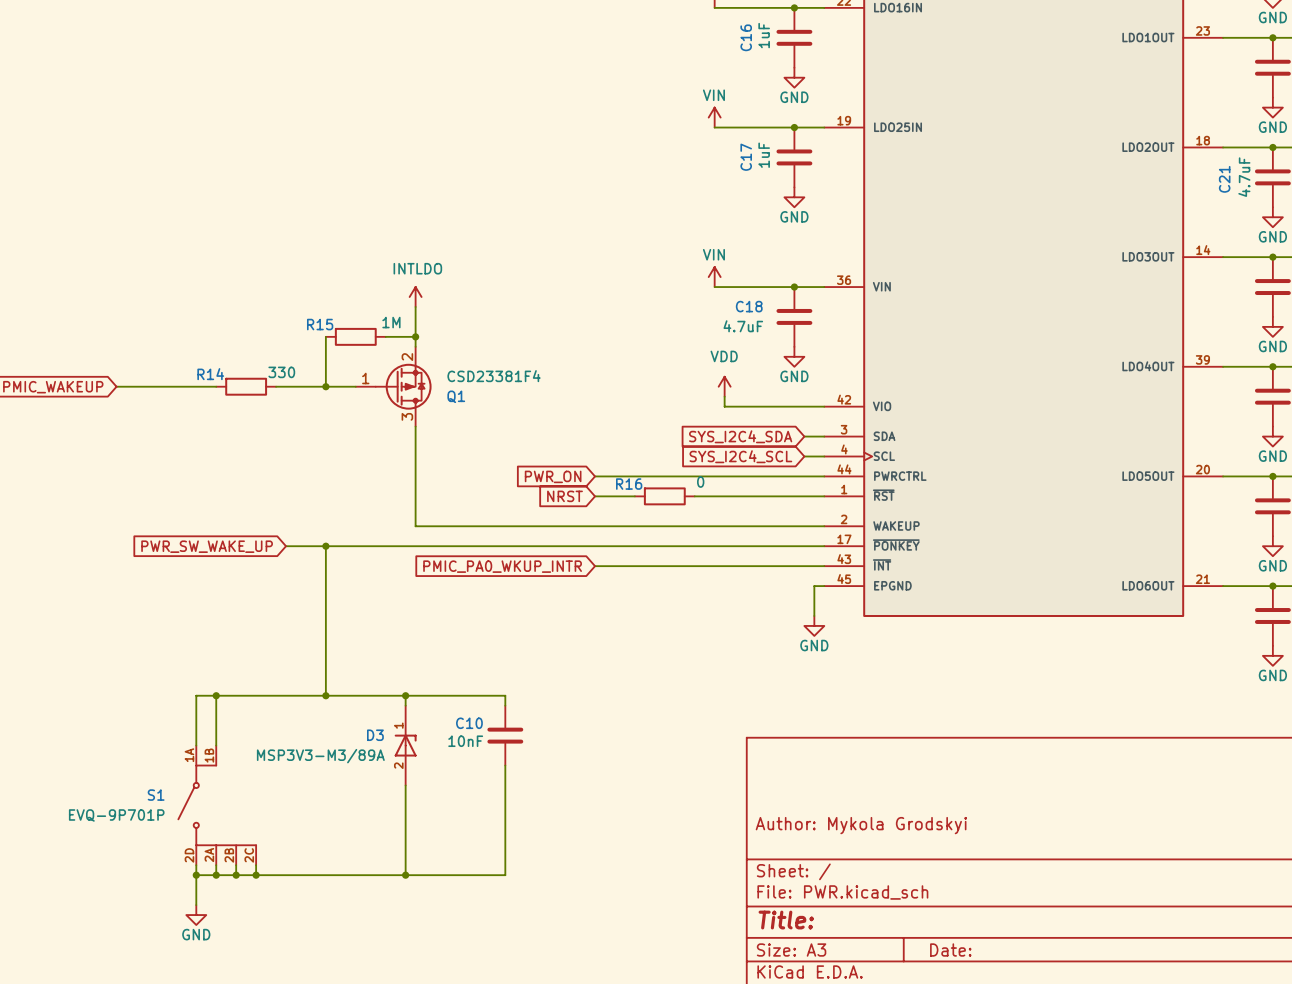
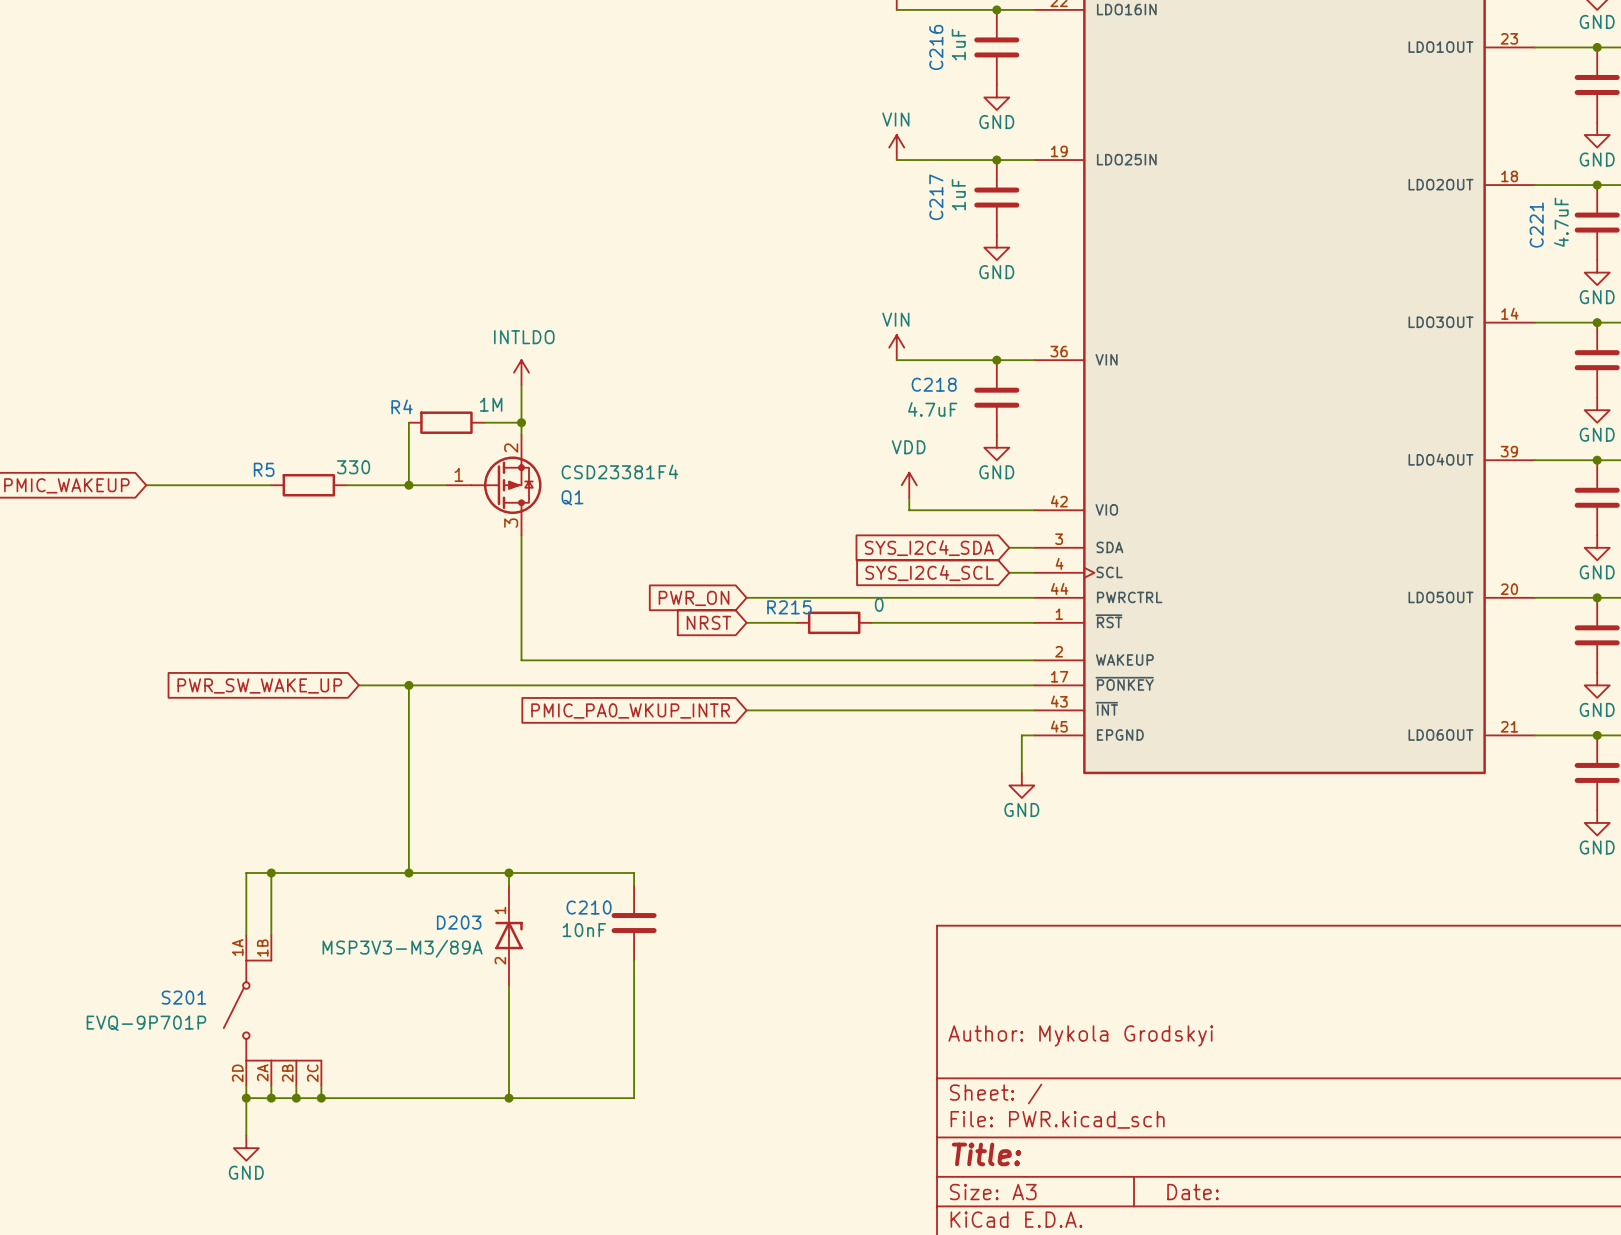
C16 name: C16 (746, 37) -> C216 (936, 47)
C17 name: C17 (746, 157) -> C217 (936, 197)
C21 name: C21 (1224, 179) -> C221 (1536, 225)
C18 name: C18 (749, 306) -> C218 (934, 384)
R15 name: R15 (320, 324) -> R4 (402, 406)
R14 name: R14 (210, 374) -> R5 (264, 469)
R16 name: R16 (629, 484) -> R215 (789, 607)
C10 name: C10 (469, 723) -> C210 (589, 907)
D3 name: D3 (375, 735) -> D203 (459, 922)
S1 name: S1 (156, 795) -> S201 (183, 997)

